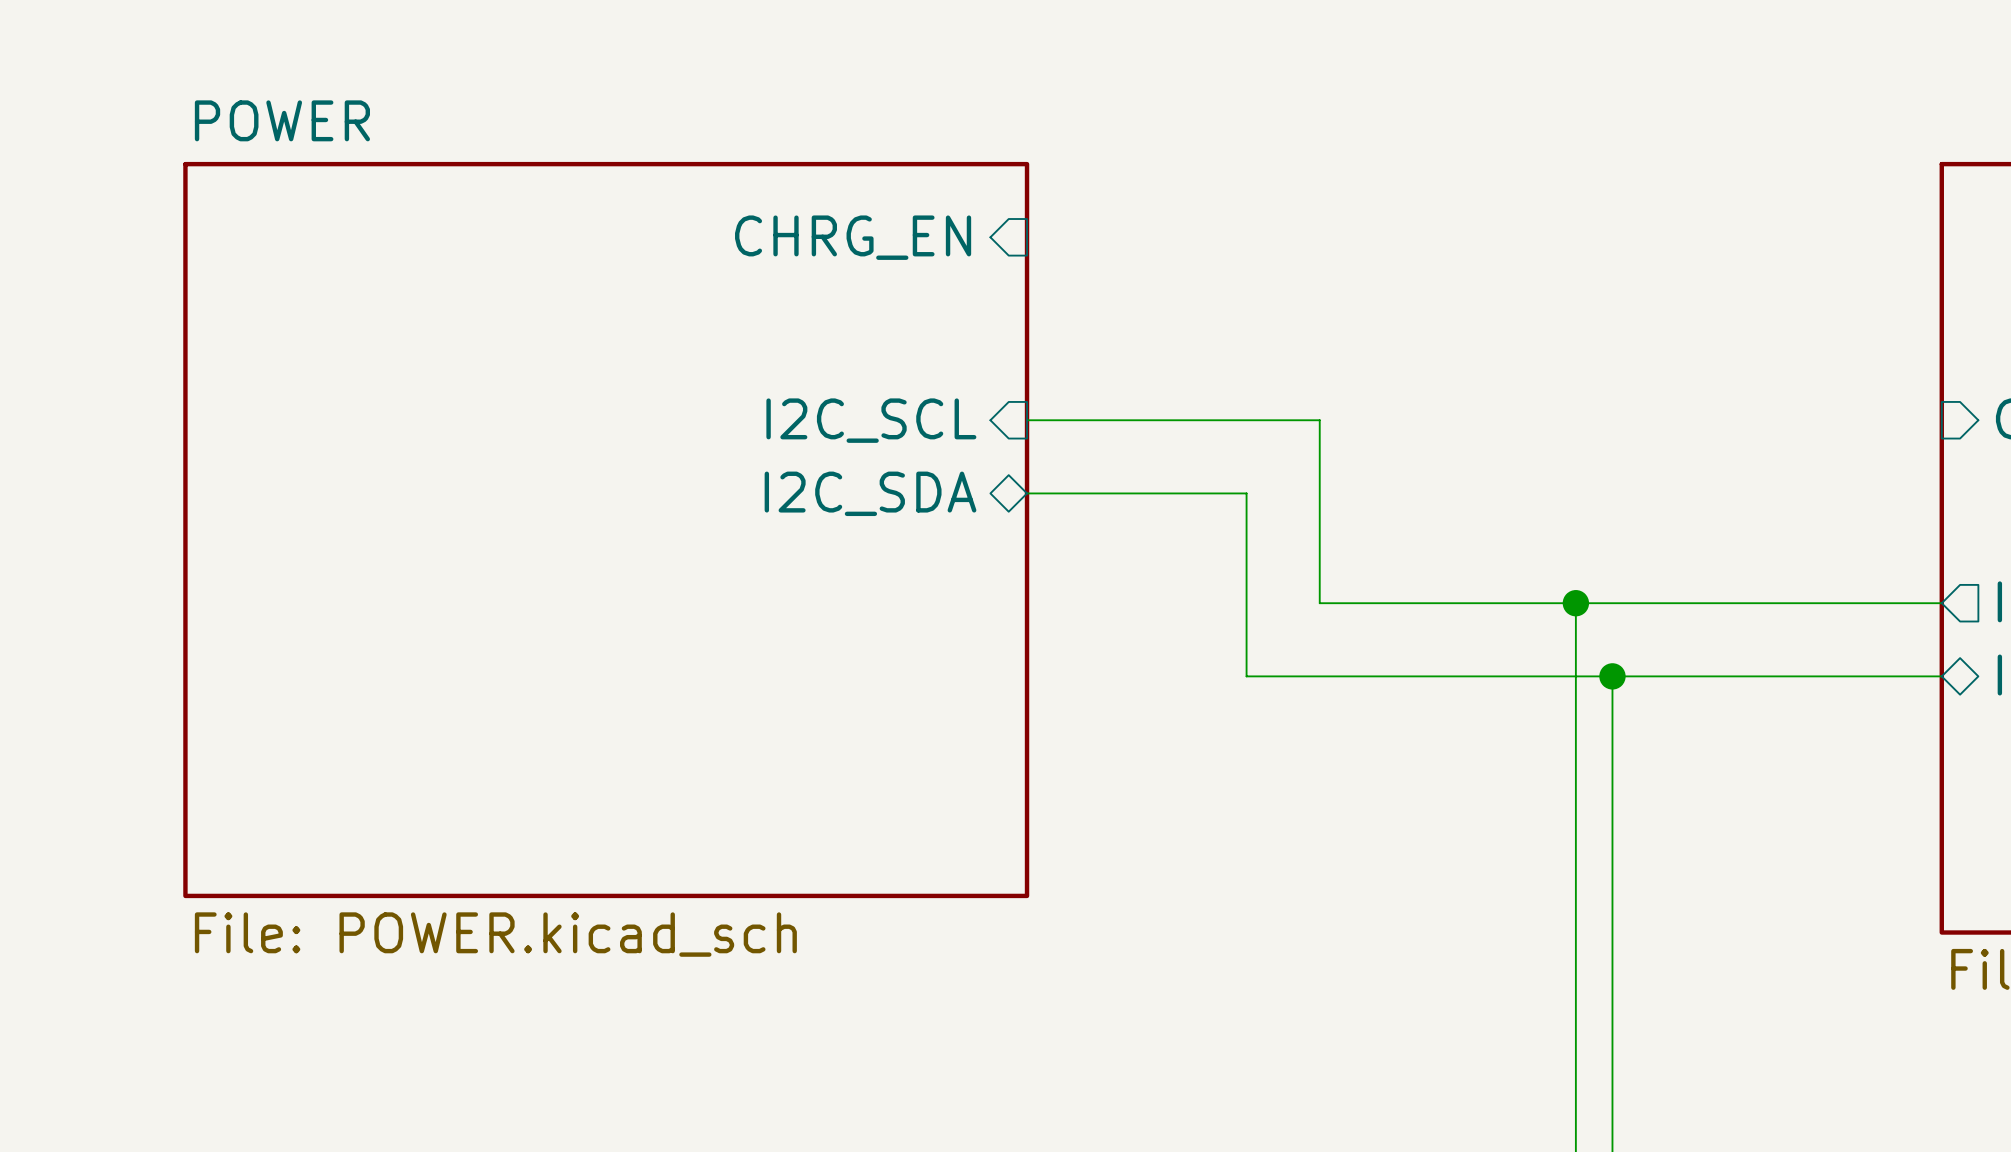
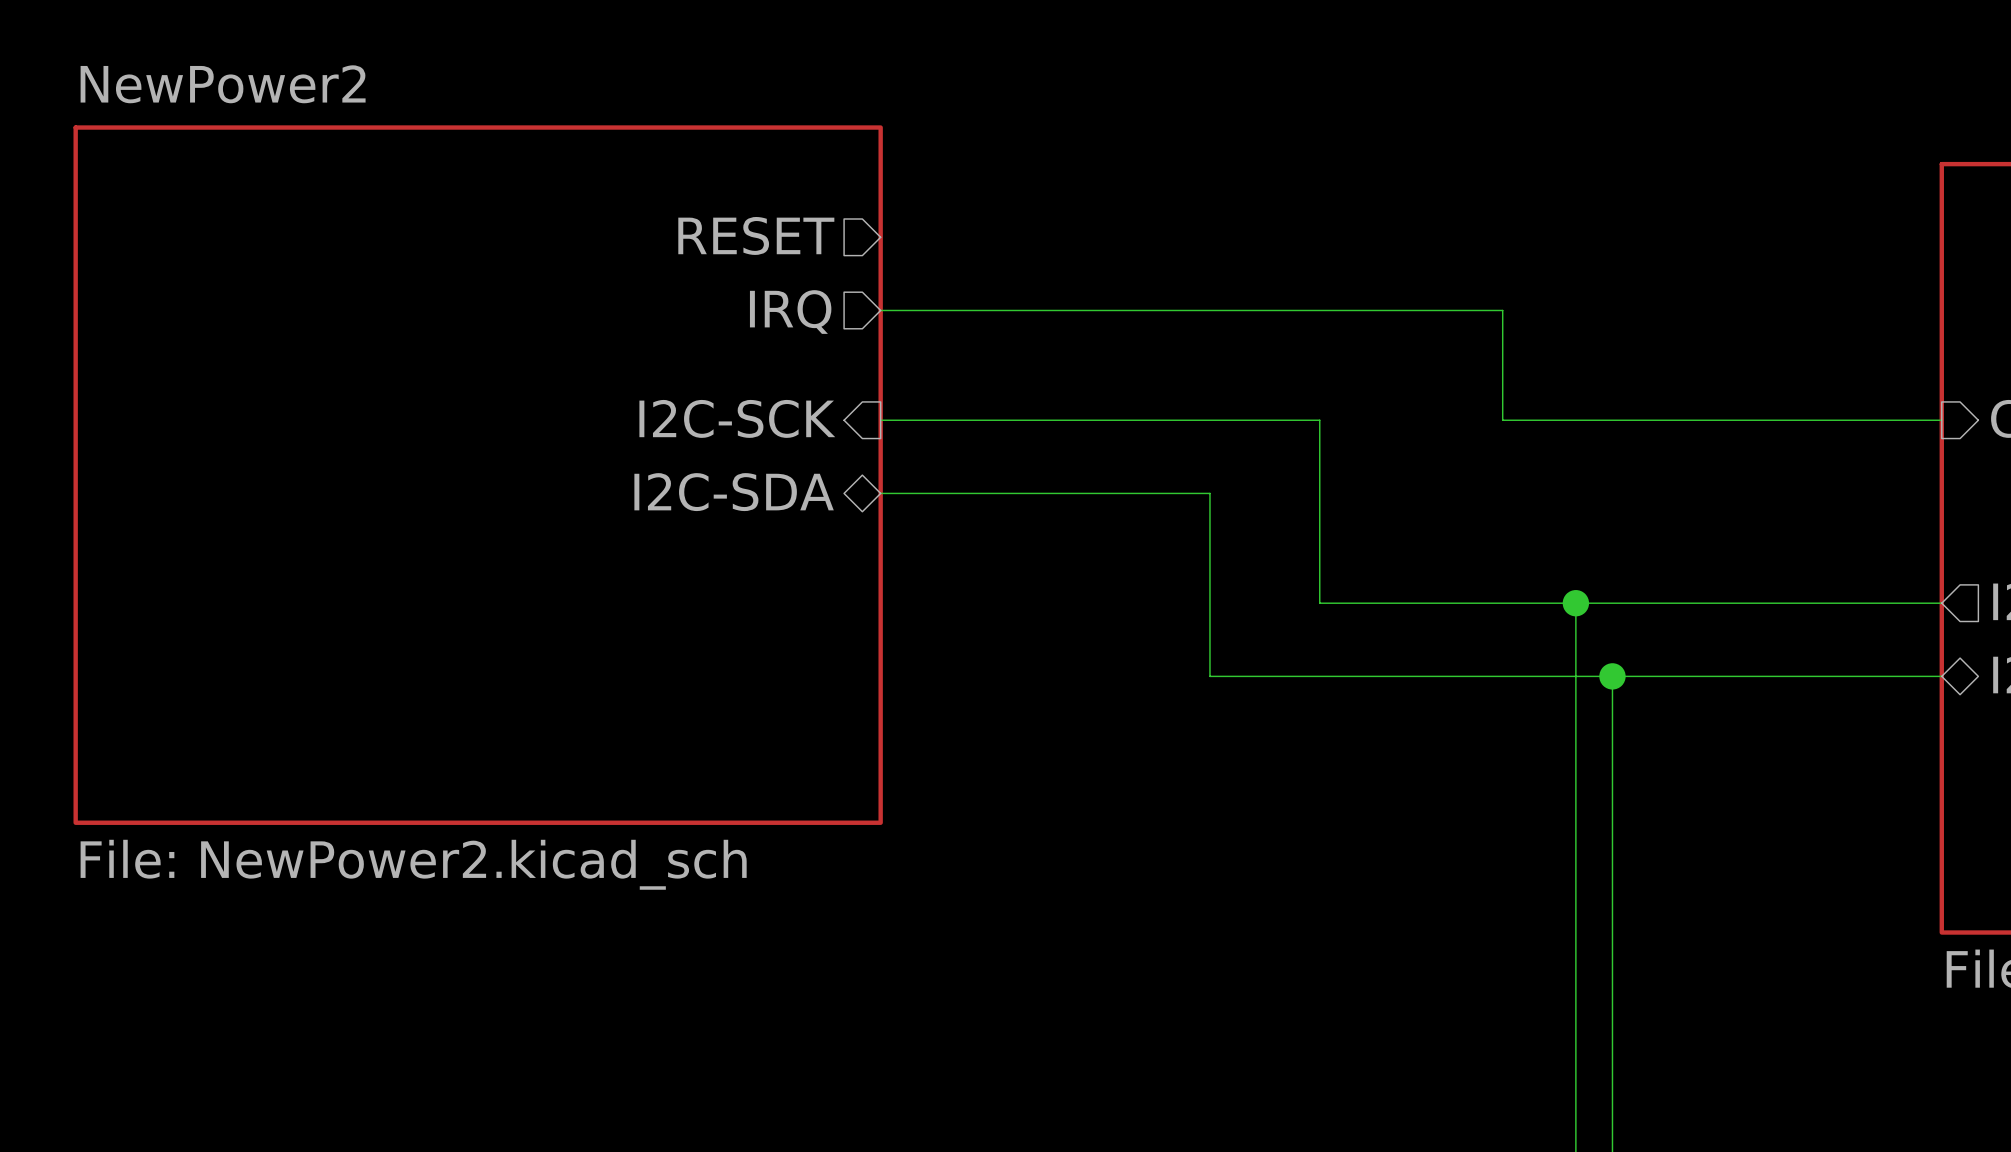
sheet pin: none -> RESET (756, 235)
sheet pin: CHRG_EN (853, 237) -> none
sheet pin: none -> IRQ (790, 312)
wire: none -> (880, 310) (1502, 310) (1502, 420) (1941, 420)
sheet pin: I2C_SCL (871, 420) -> I2C-SCK (737, 418)
wire: none -> (880, 420) (1027, 420)
sheet NewPower2: none -> File: NewPower2.kicad_sch (478, 475)
sheet pin: I2C_SDA (870, 493) -> I2C-SDA (734, 492)
wire: none -> (880, 493) (1027, 493)
wire: (1209, 493) (1246, 493) (1246, 676) -> (1209, 493) (1209, 676) (1246, 676)
sheet POWER: File: POWER.kicad_sch (606, 530) -> none

